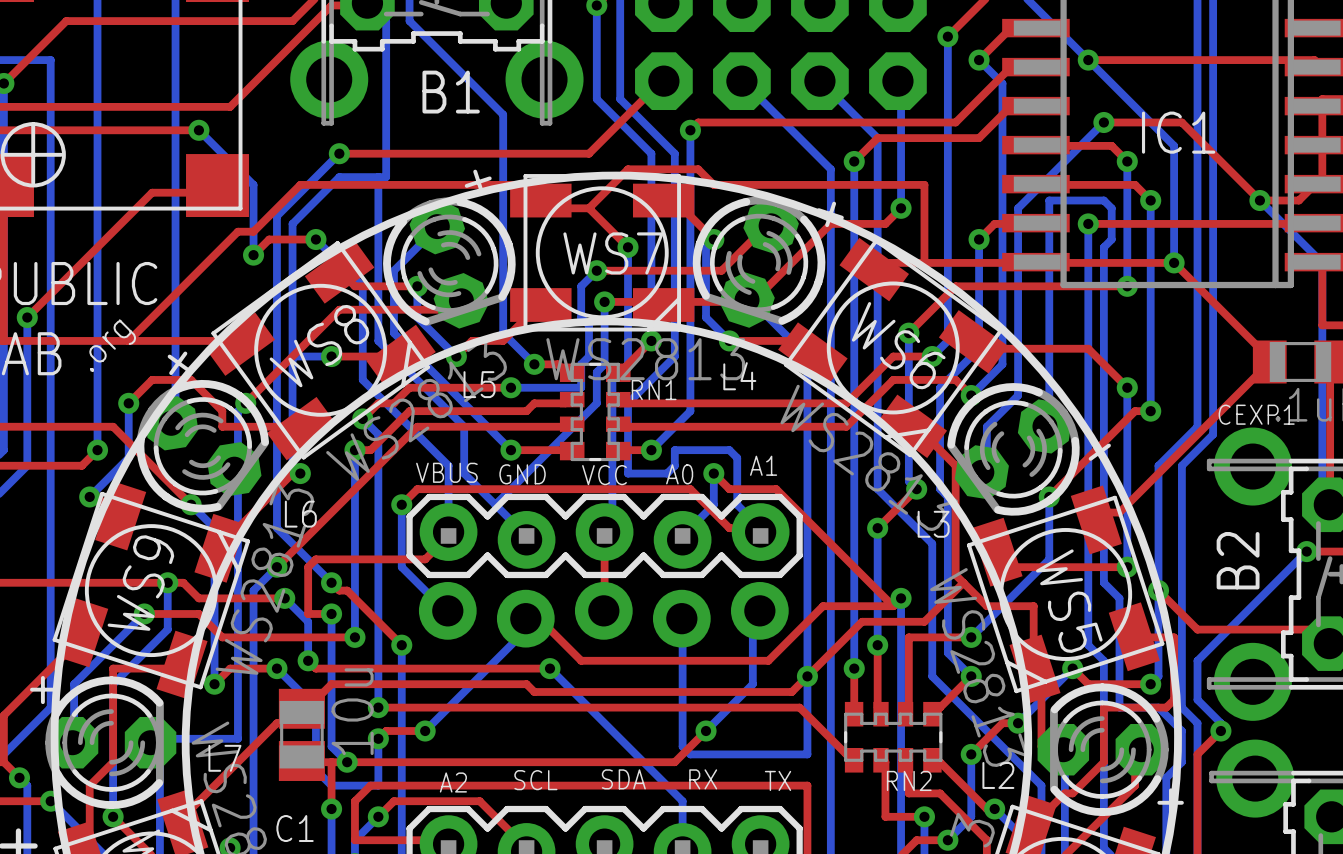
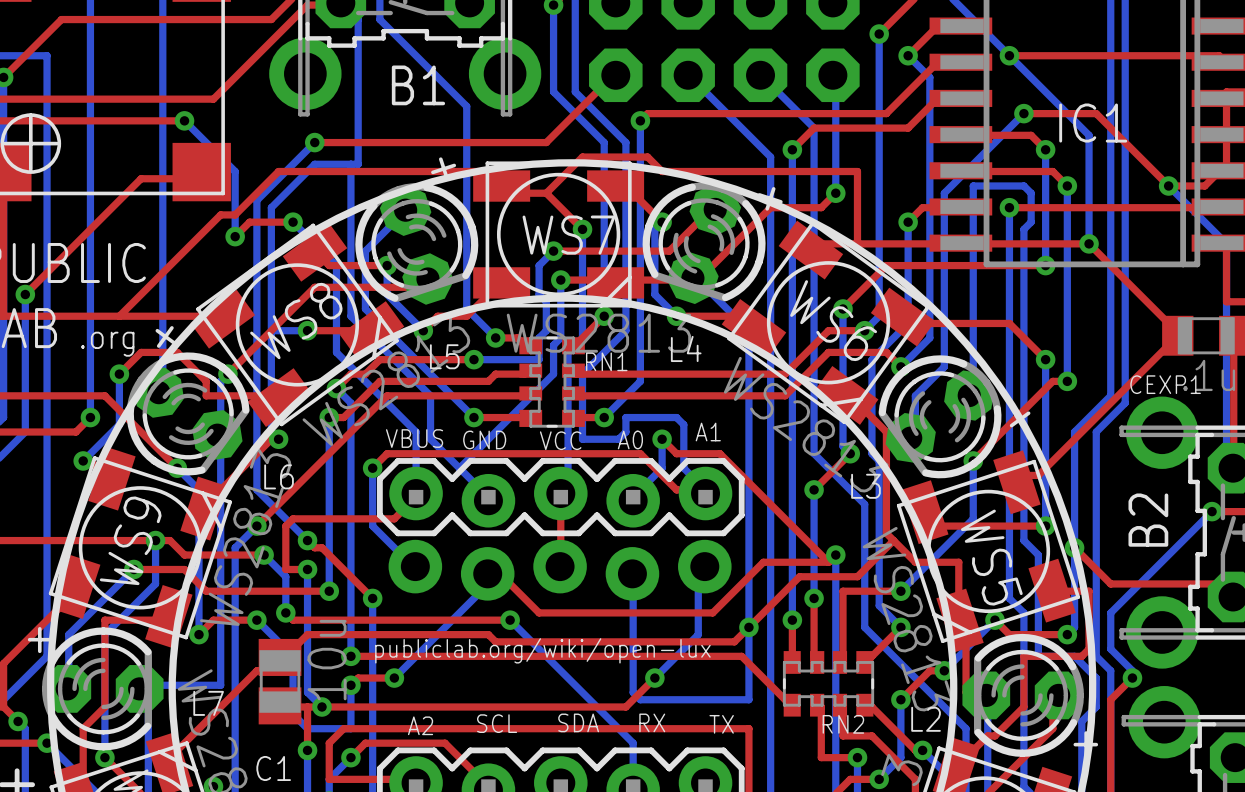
text rotation: 0° (112, 345) -> 45° clockwise (107, 344)
text: none -> publiclab.org/wiki/open-lux (542, 650)

